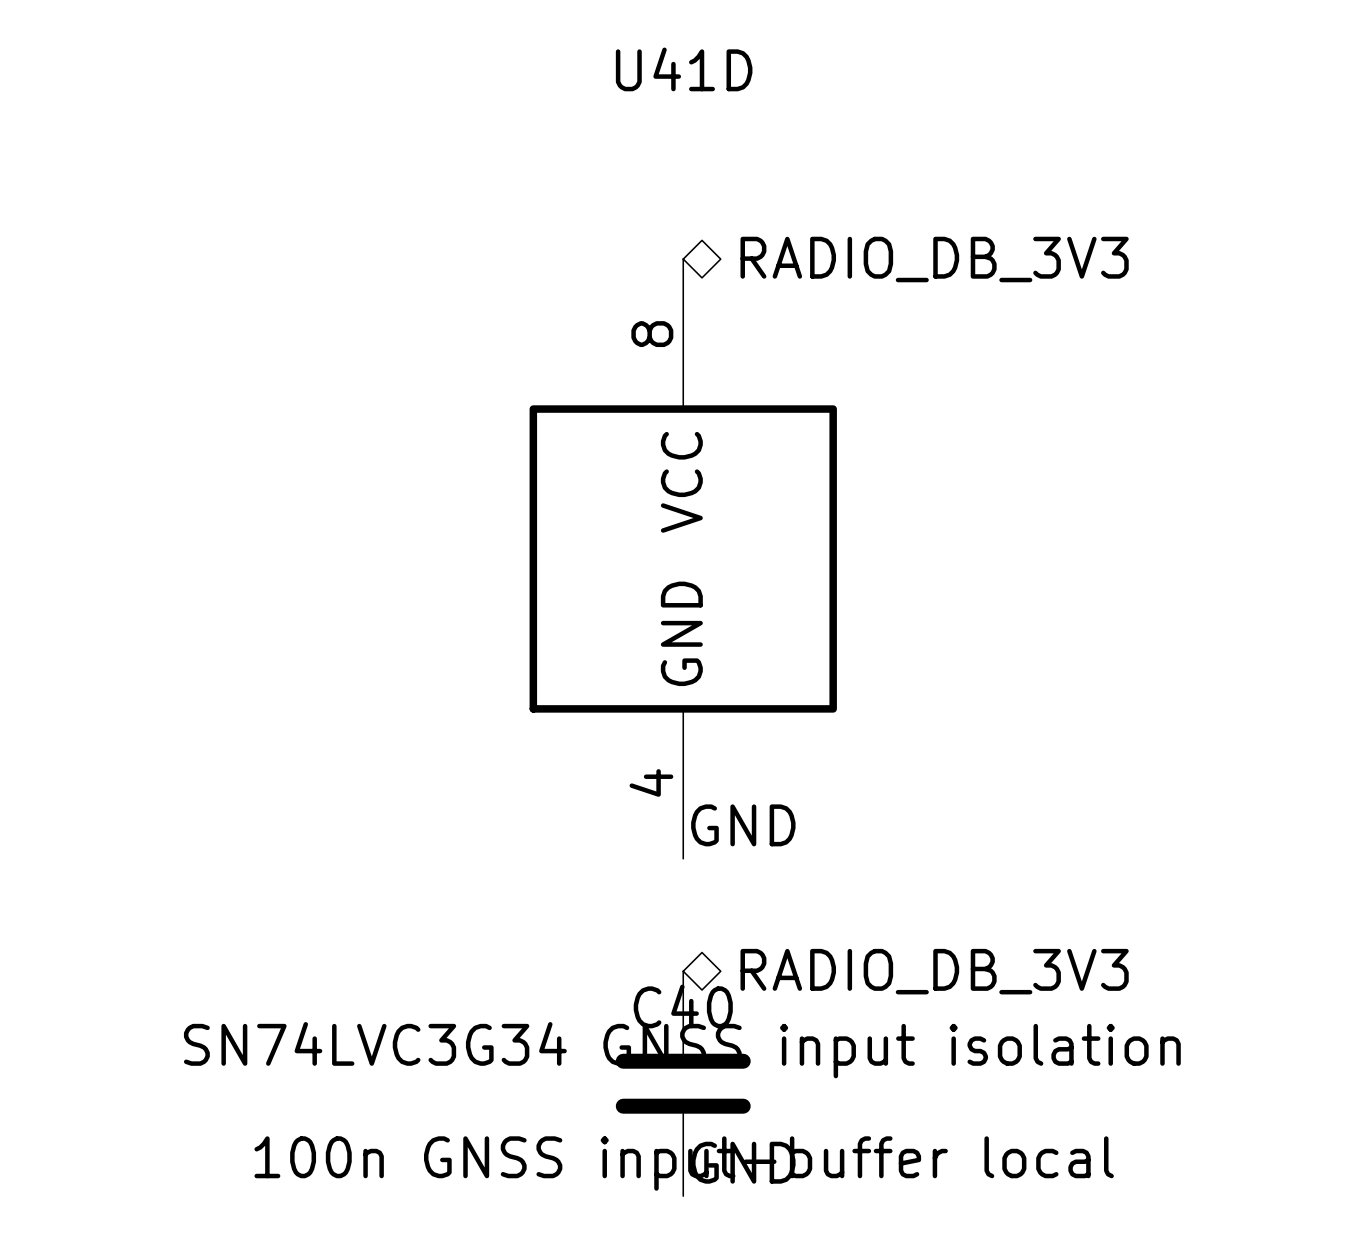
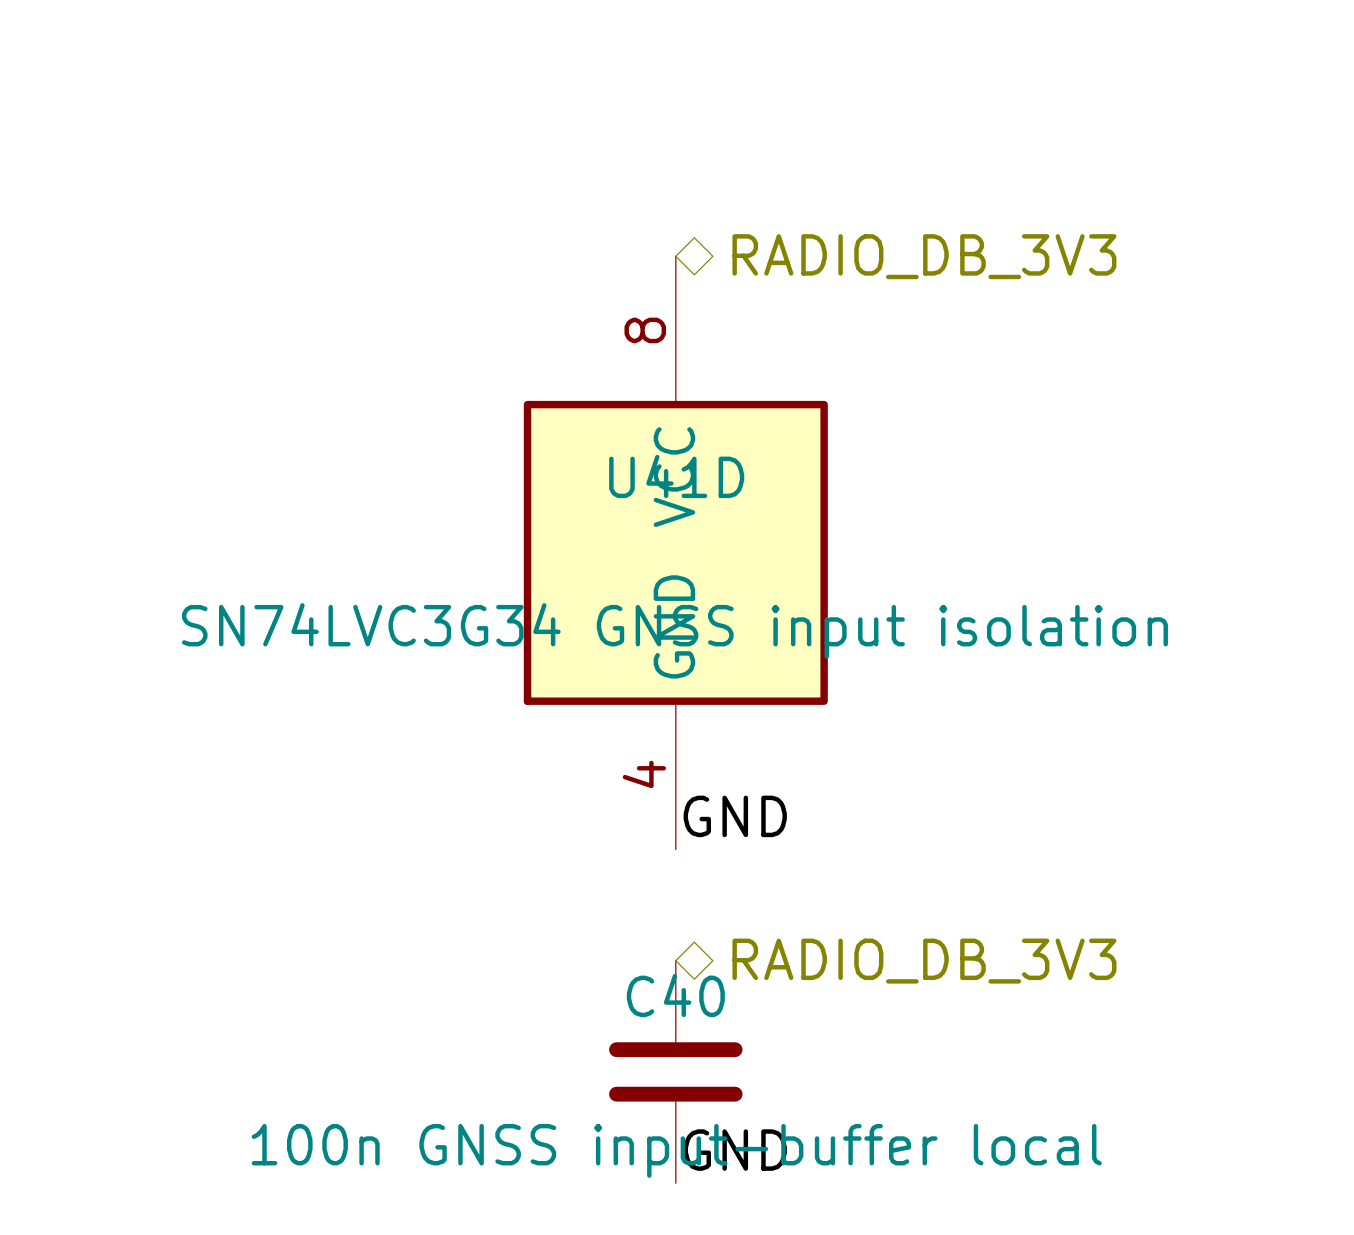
U41D name position: U41D (684, 69) -> U41D (676, 476)
U41D value position: SN74LVC3G34 GNSS input isolation (682, 1050) -> SN74LVC3G34 GNSS input isolation (674, 630)

